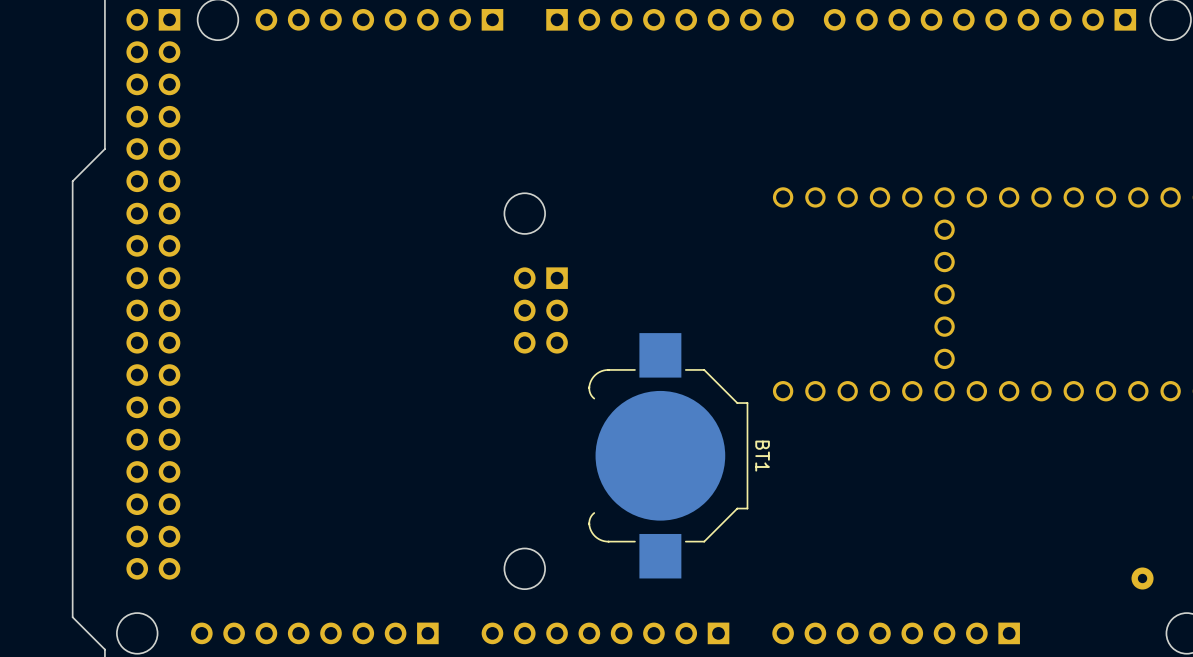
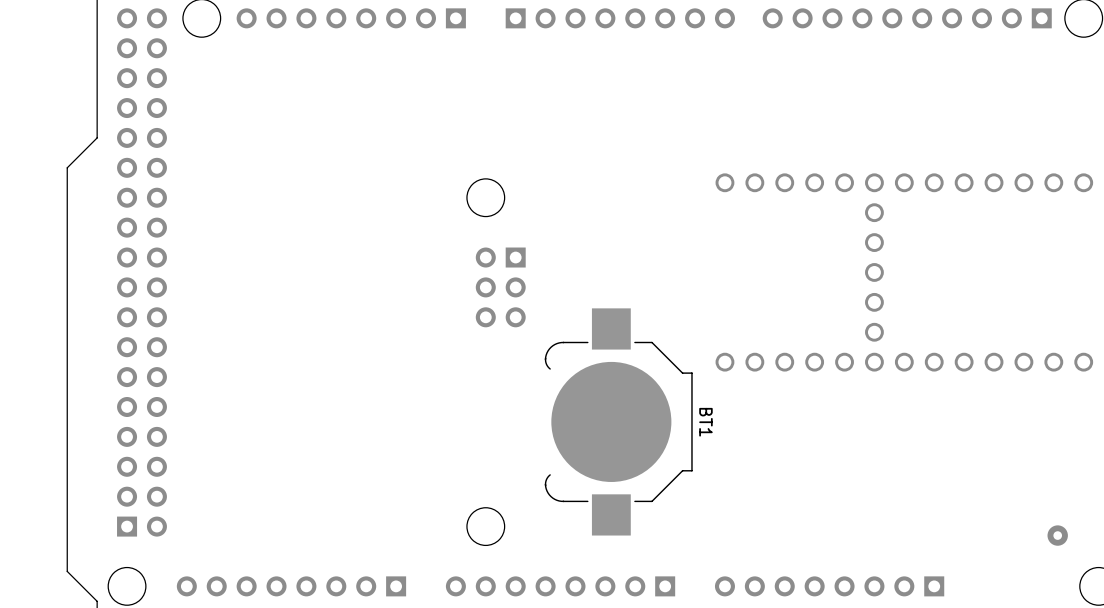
part rotation: 0° (153, 294) -> 180° (141, 272)

